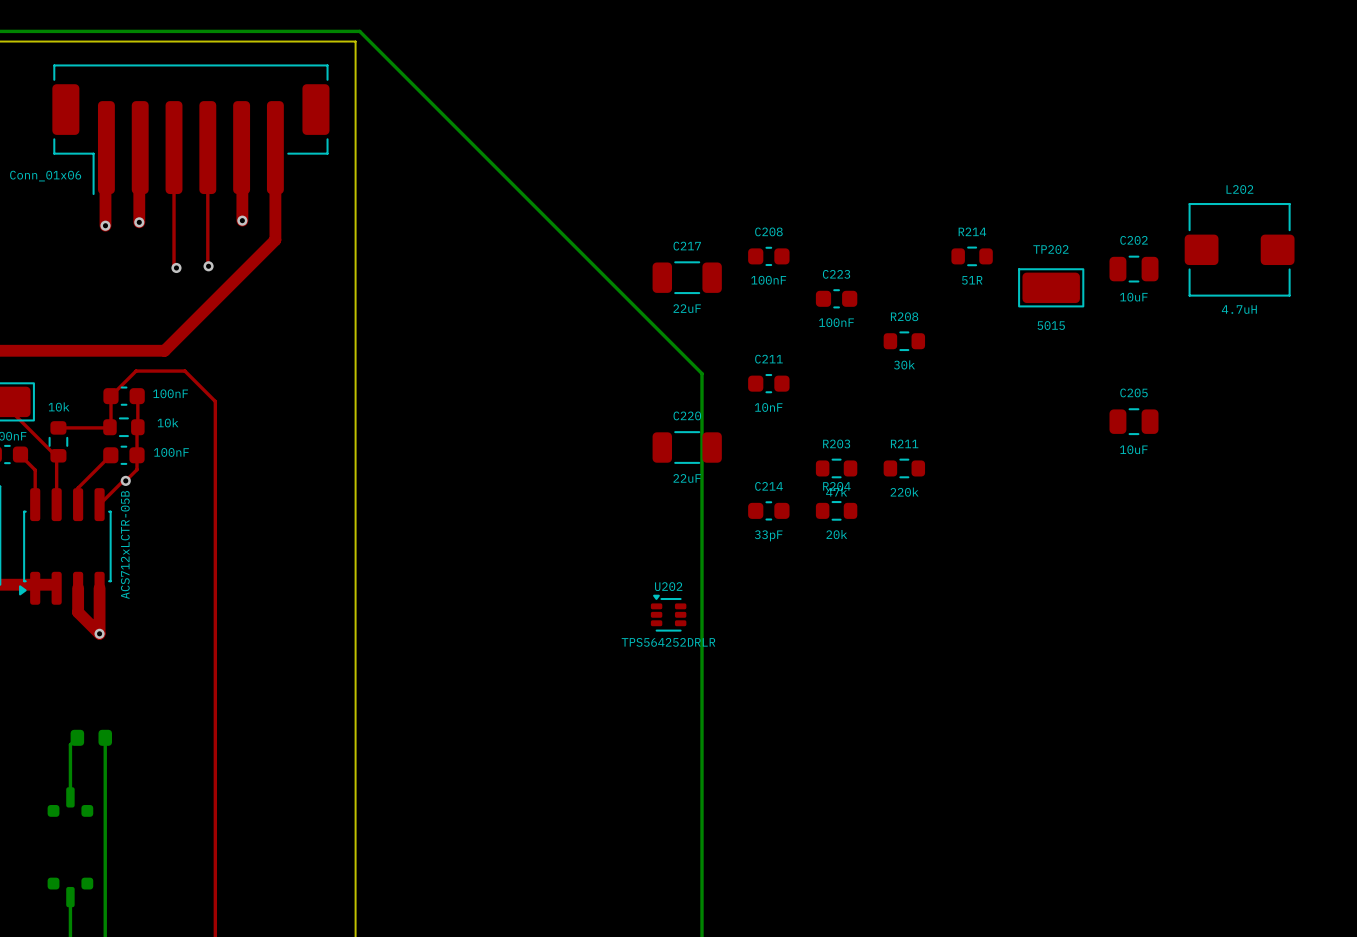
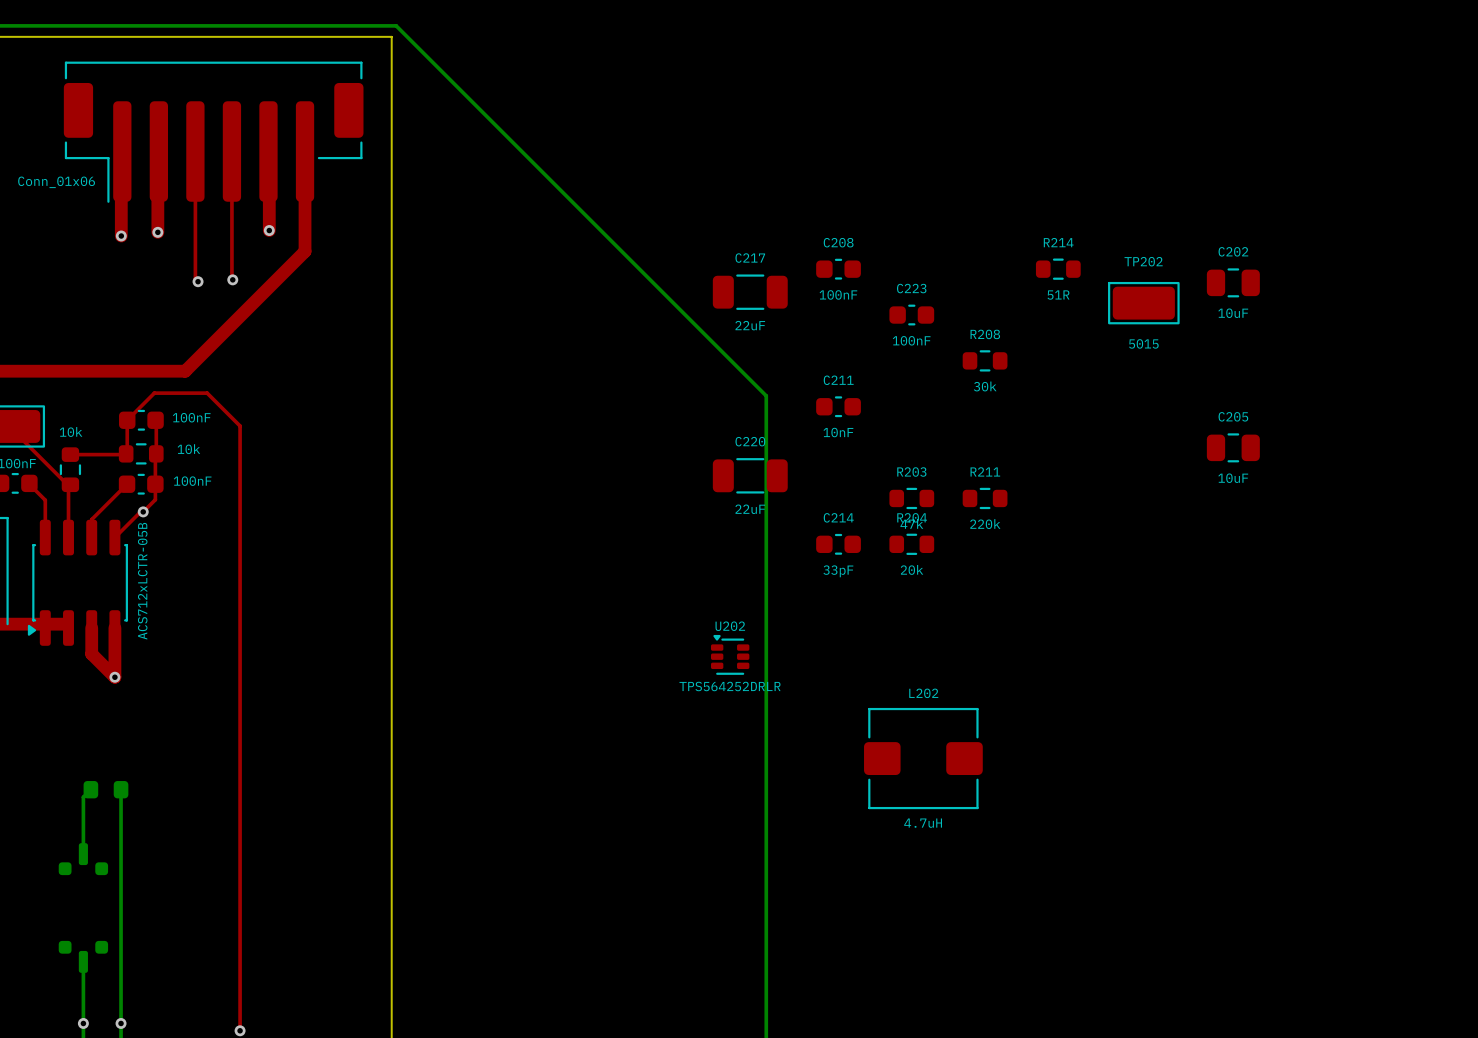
L202 position: (1239, 249) -> (923, 758)

